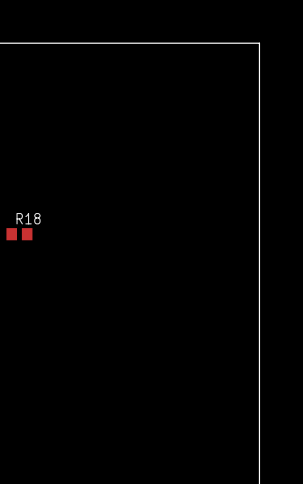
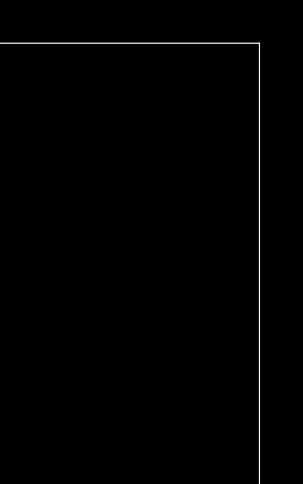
R18: (19, 234) -> none

